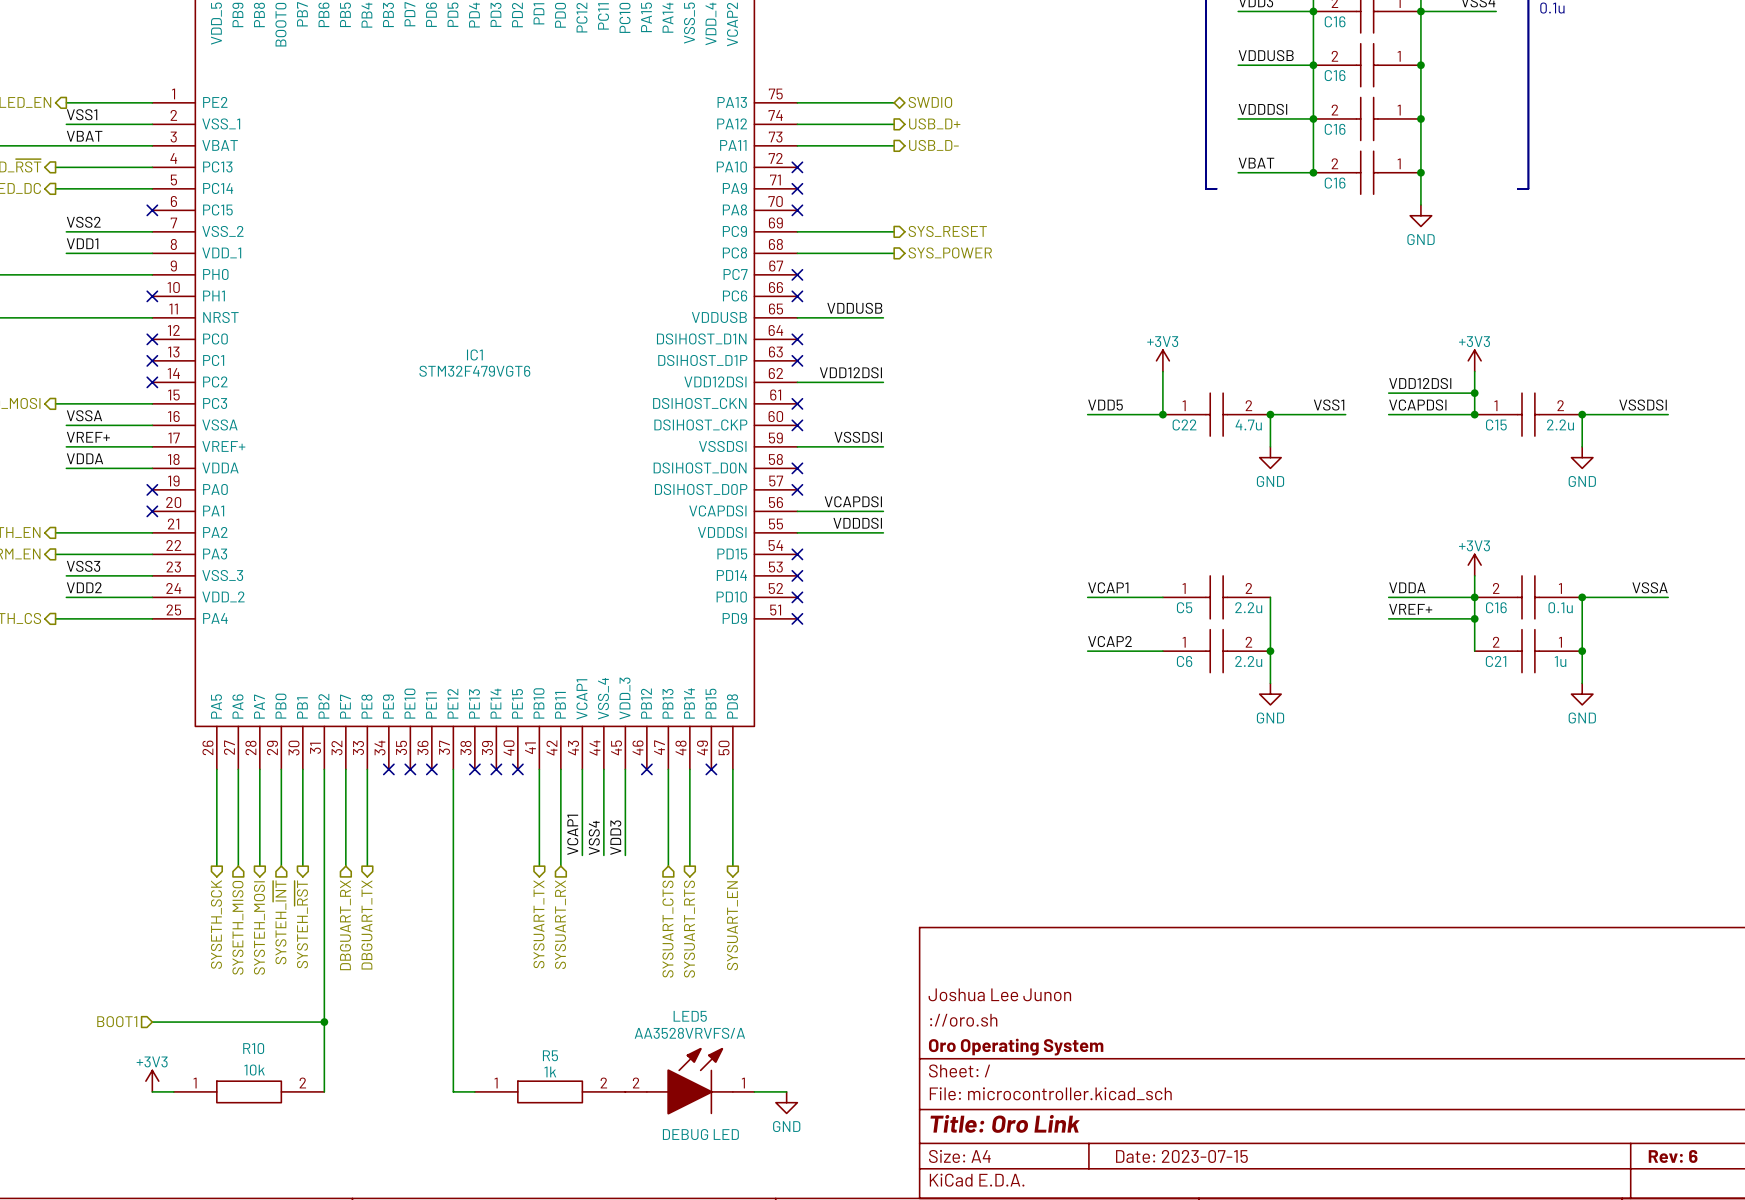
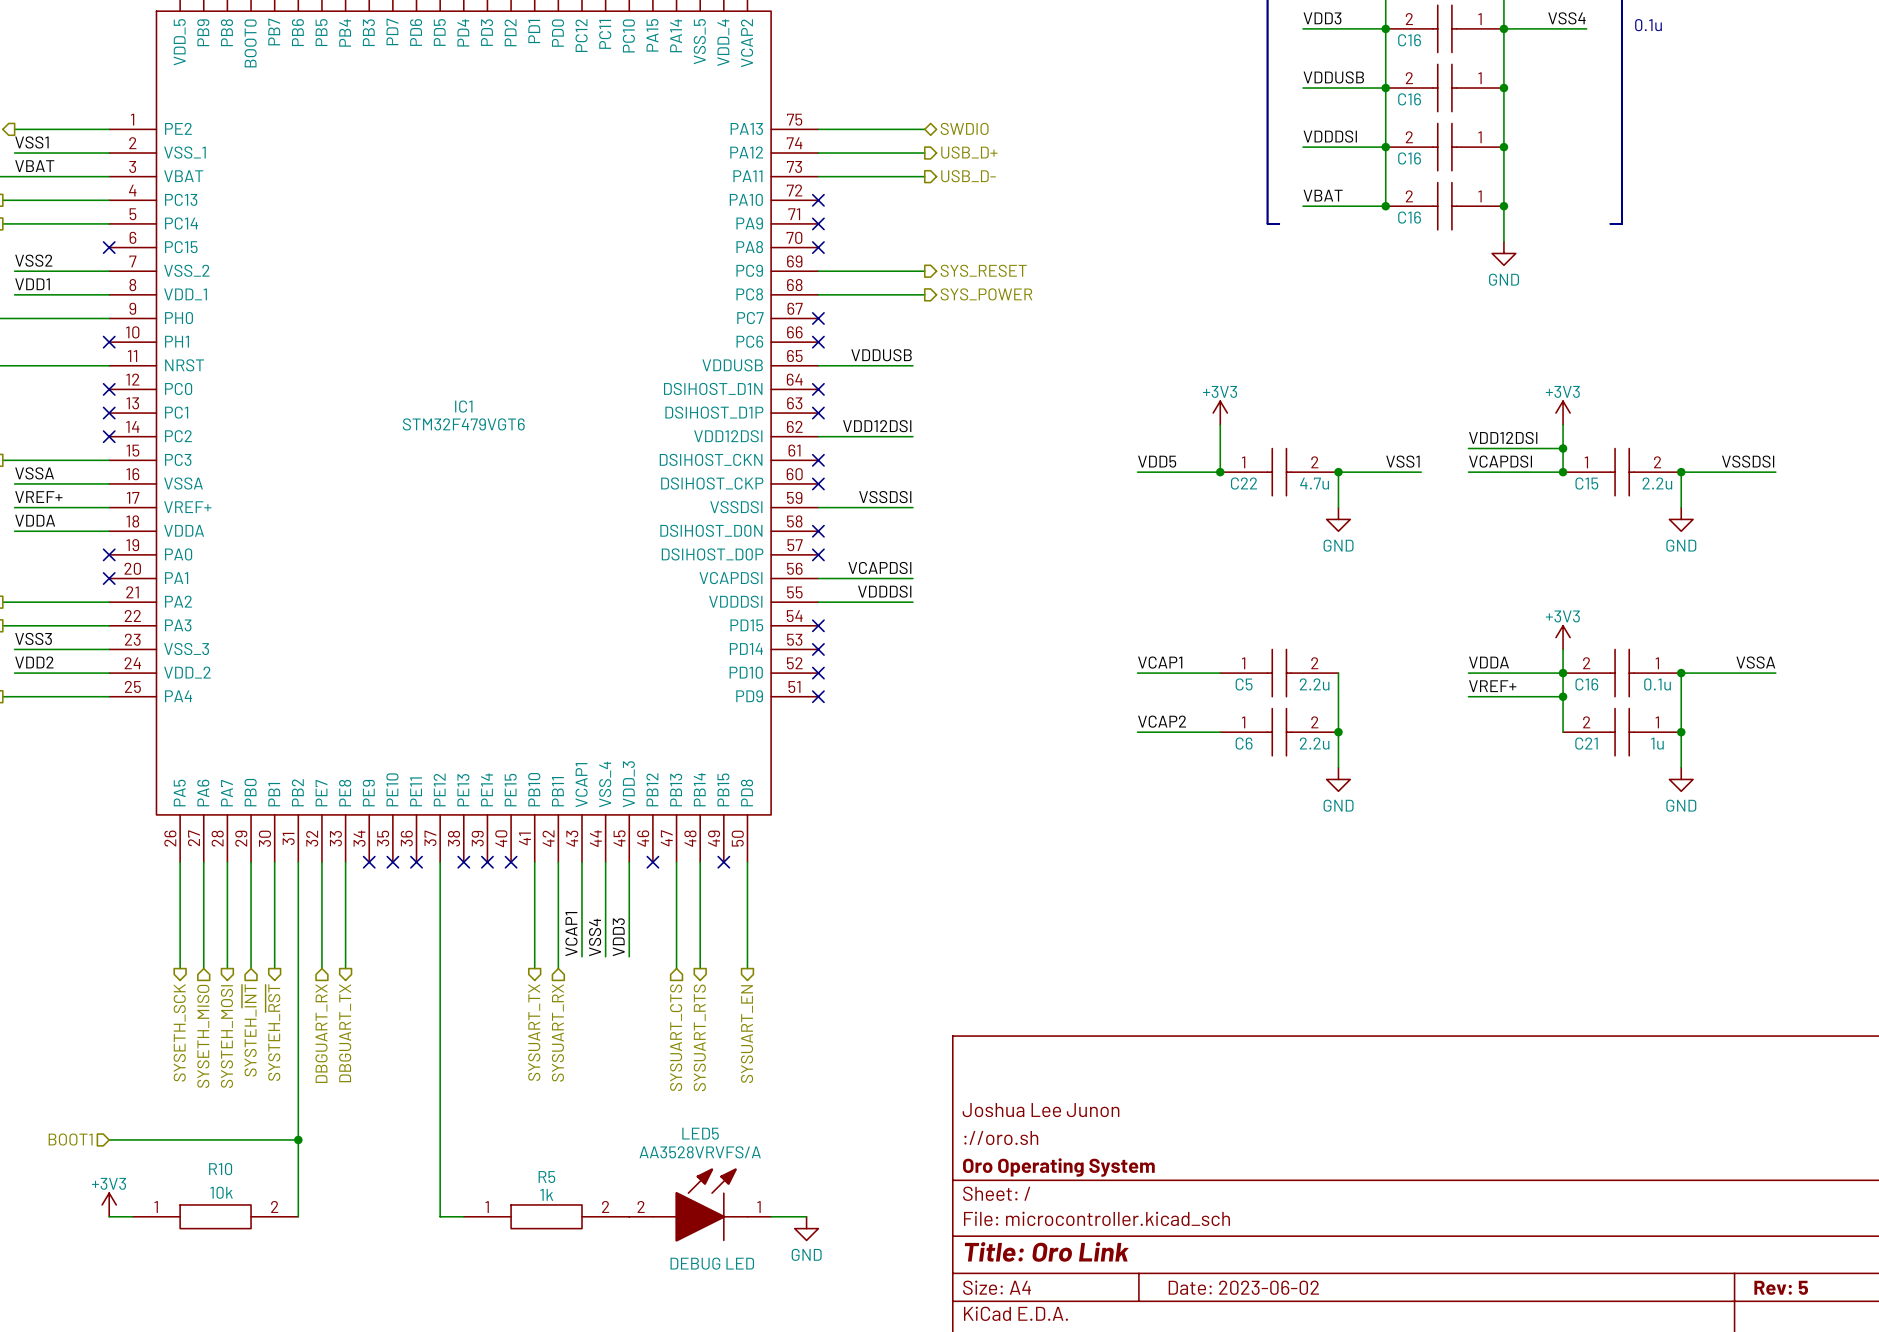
title block: Date: 2023-07-15 (1181, 1156) -> Date: 2023-06-02 (1243, 1287)
title block: Rev: 6 (1673, 1156) -> Rev: 5 (1781, 1287)

